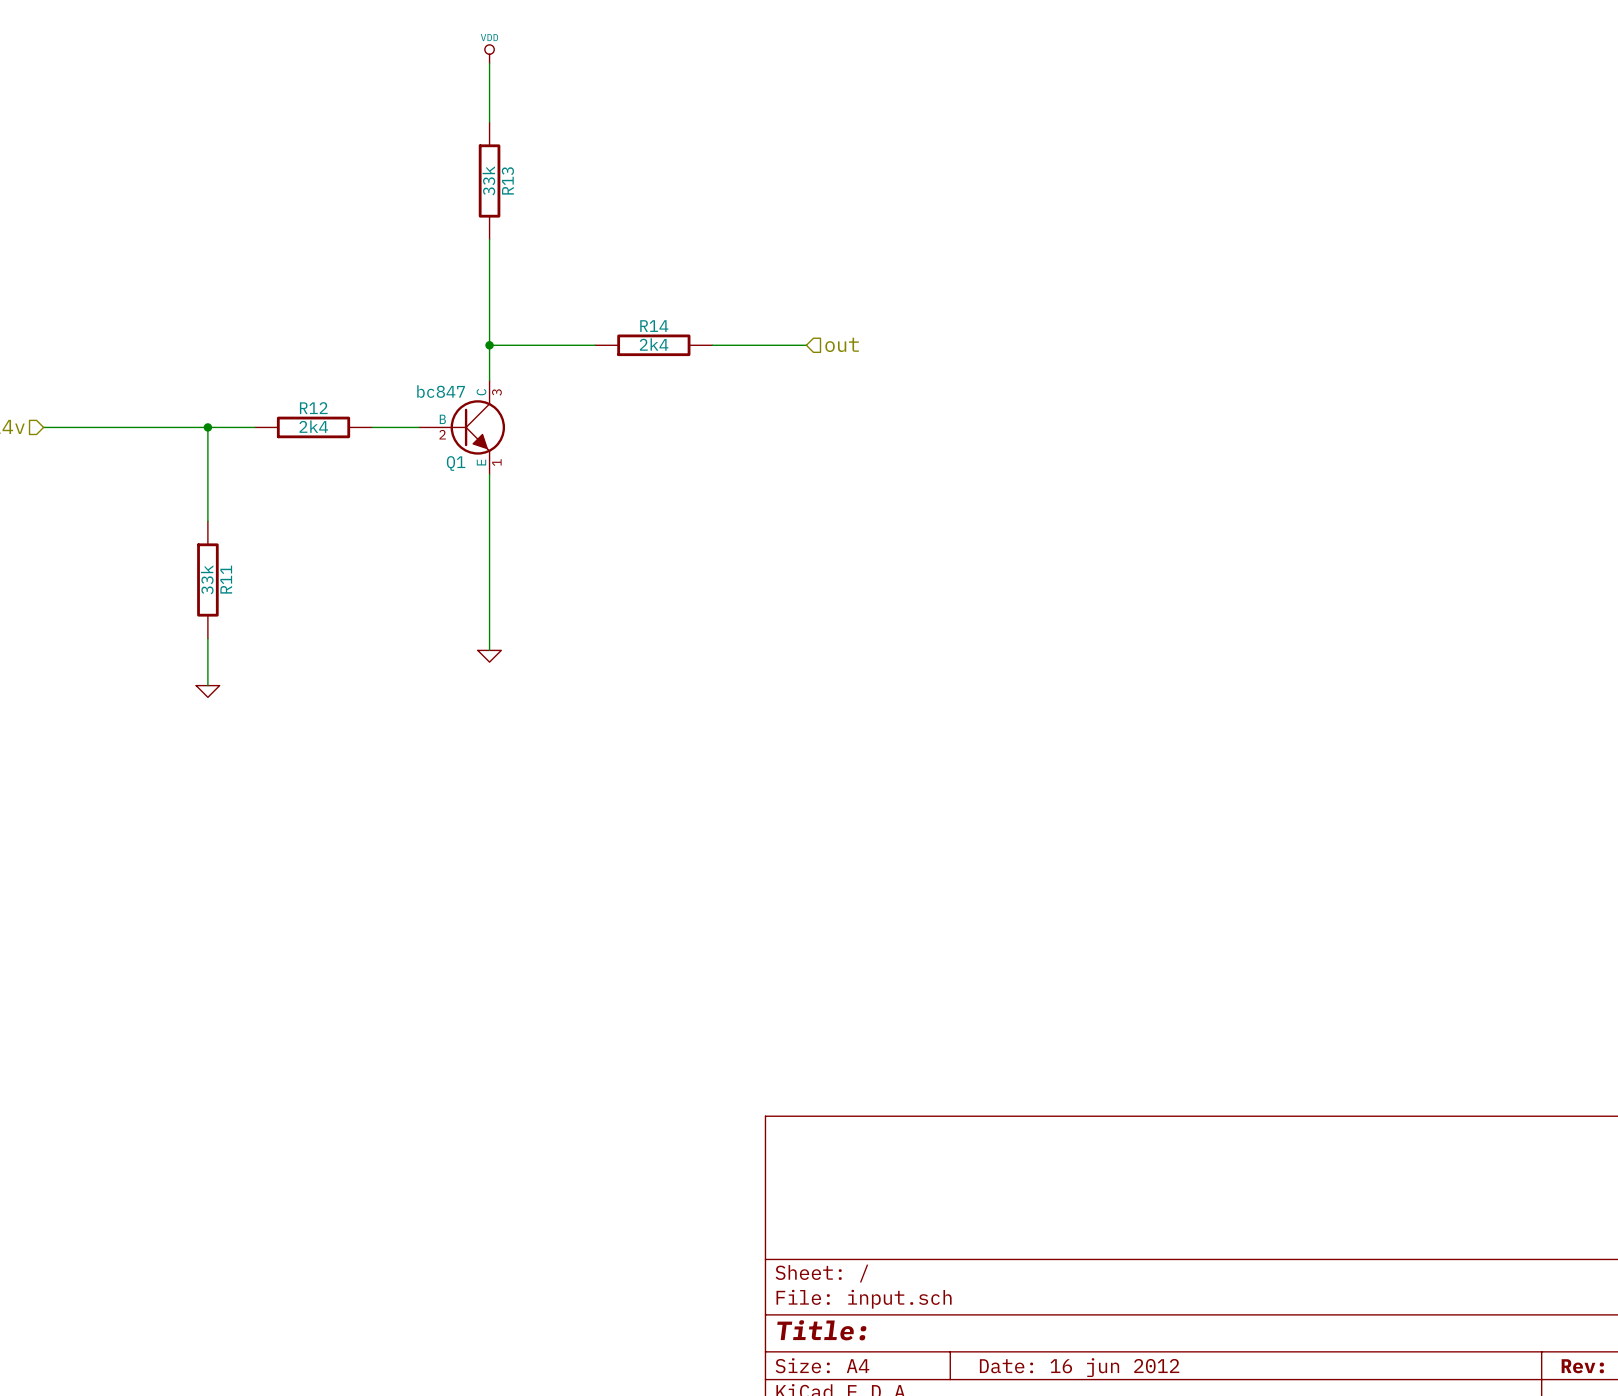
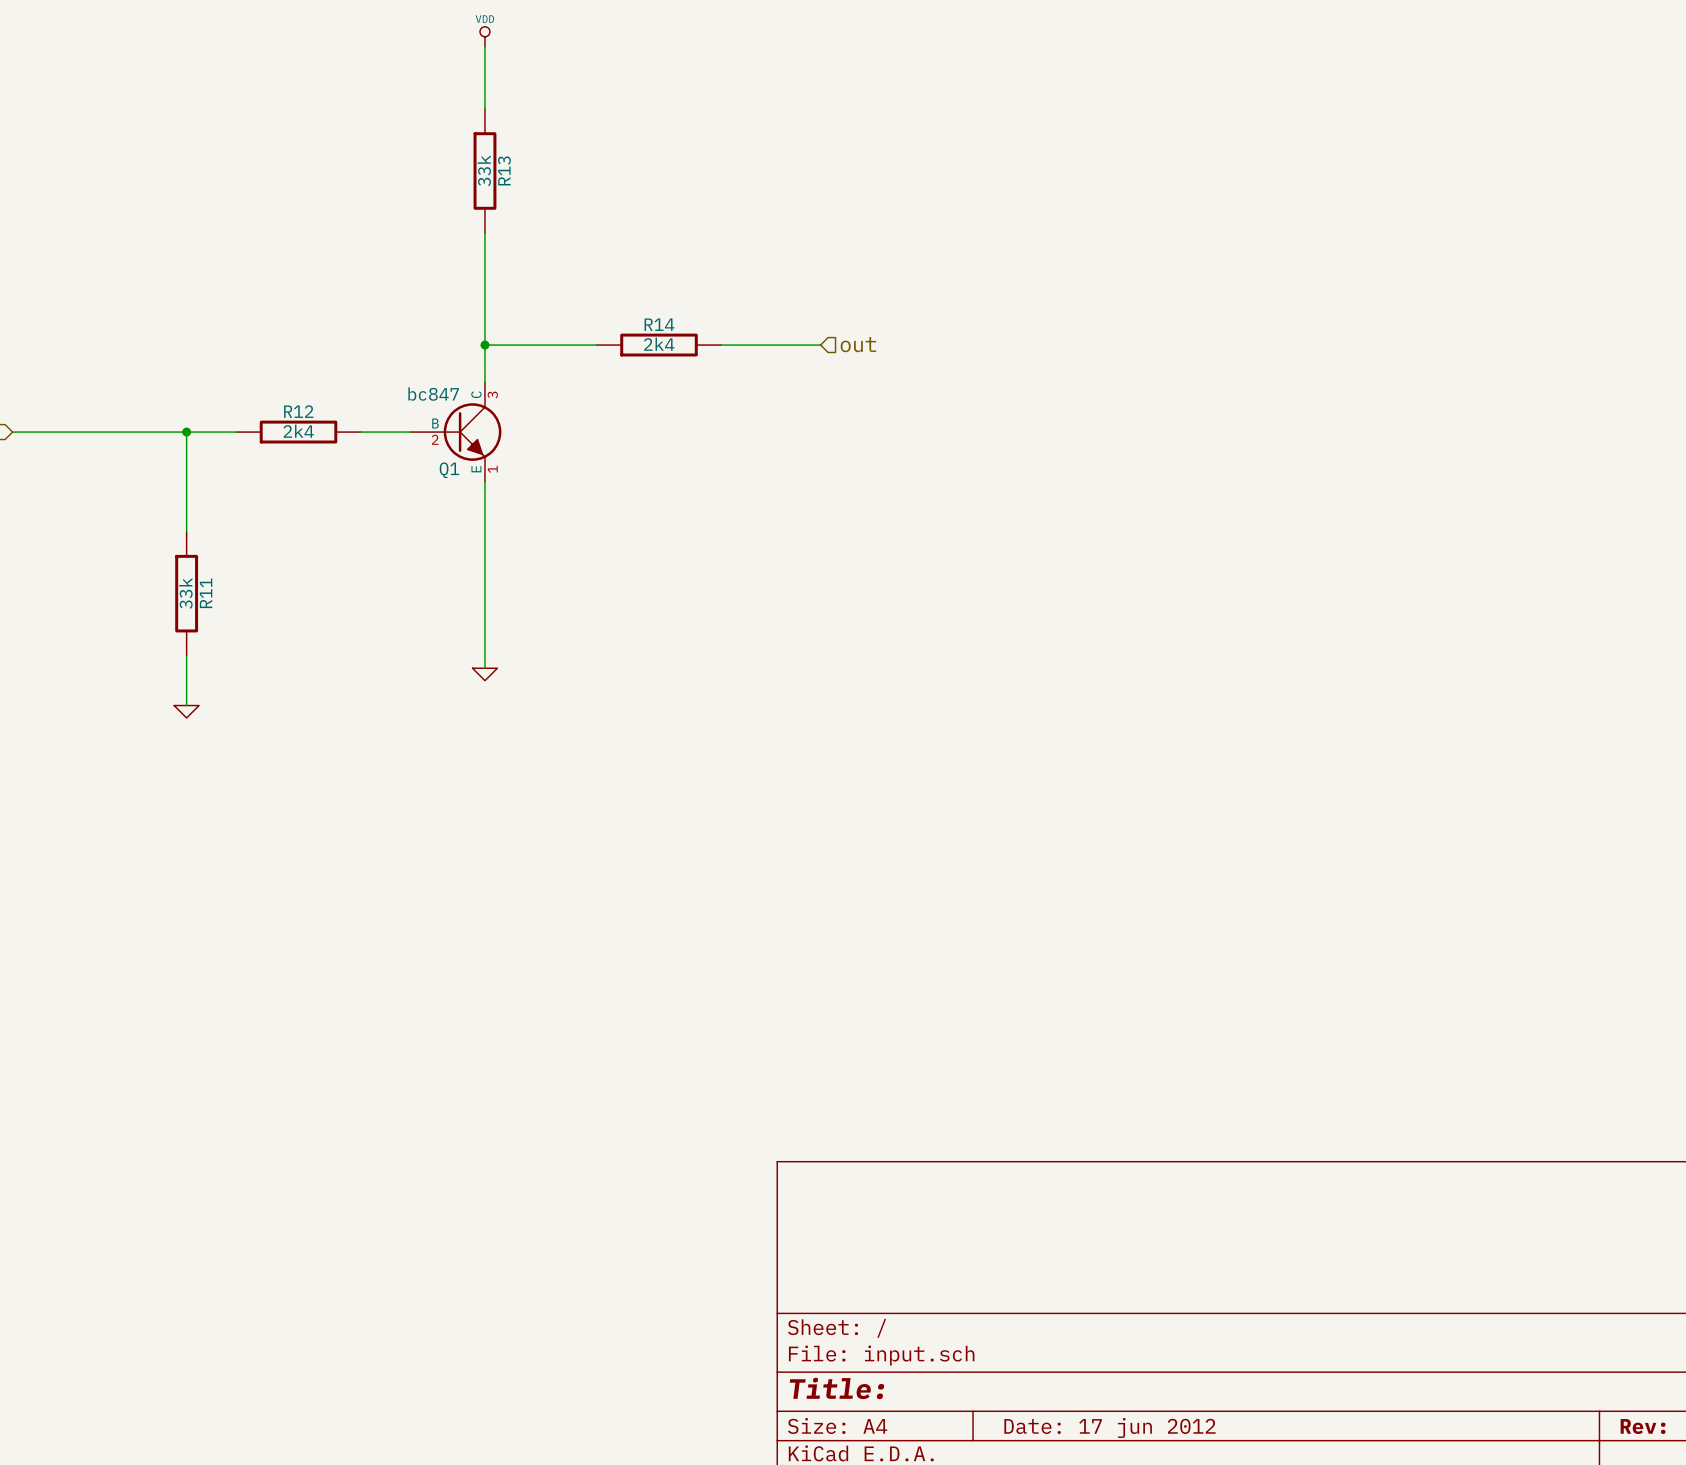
title block: Date: 16 jun 2012 (1079, 1367) -> Date: 17 jun 2012 (1110, 1427)

